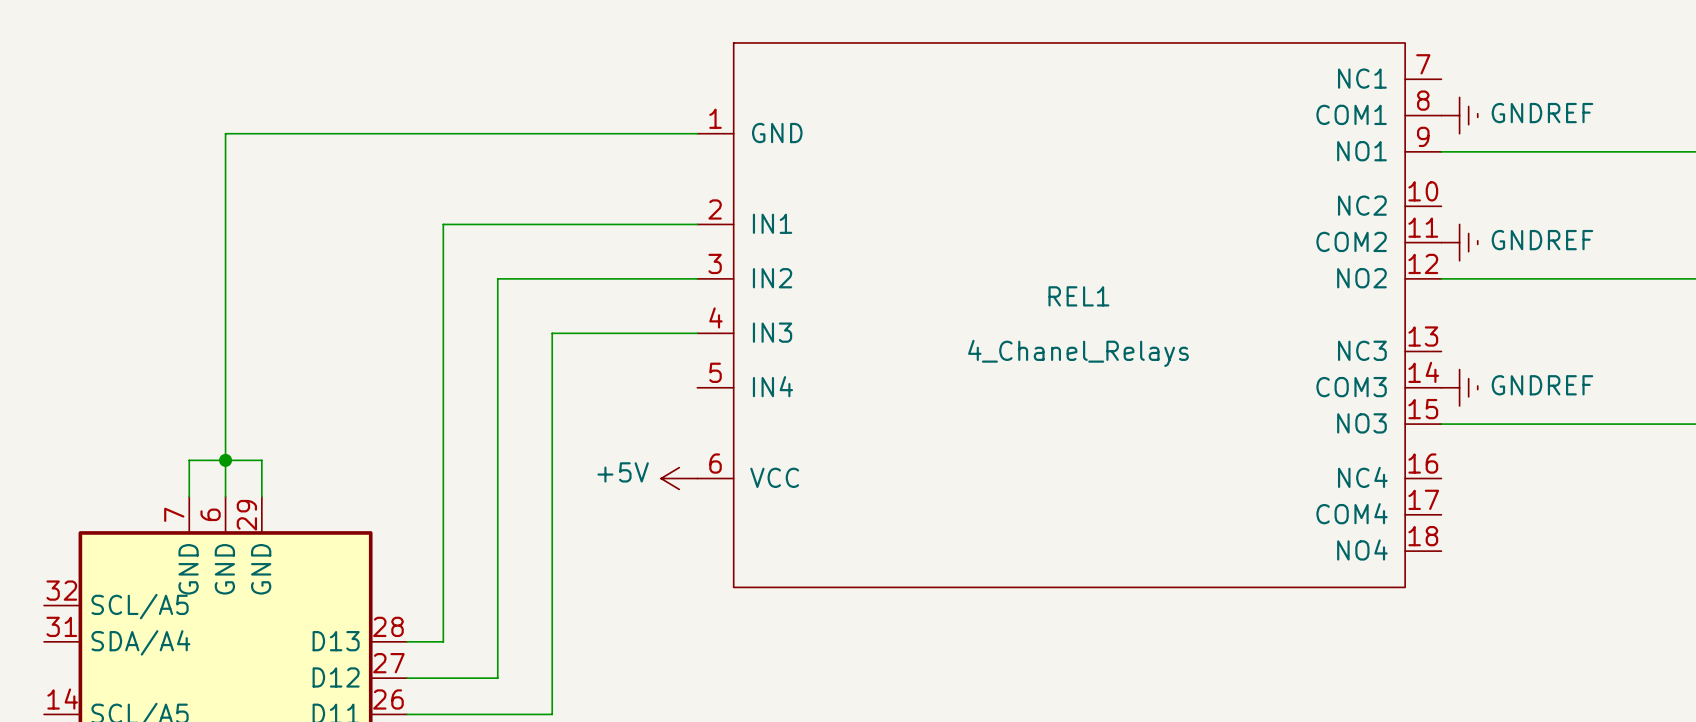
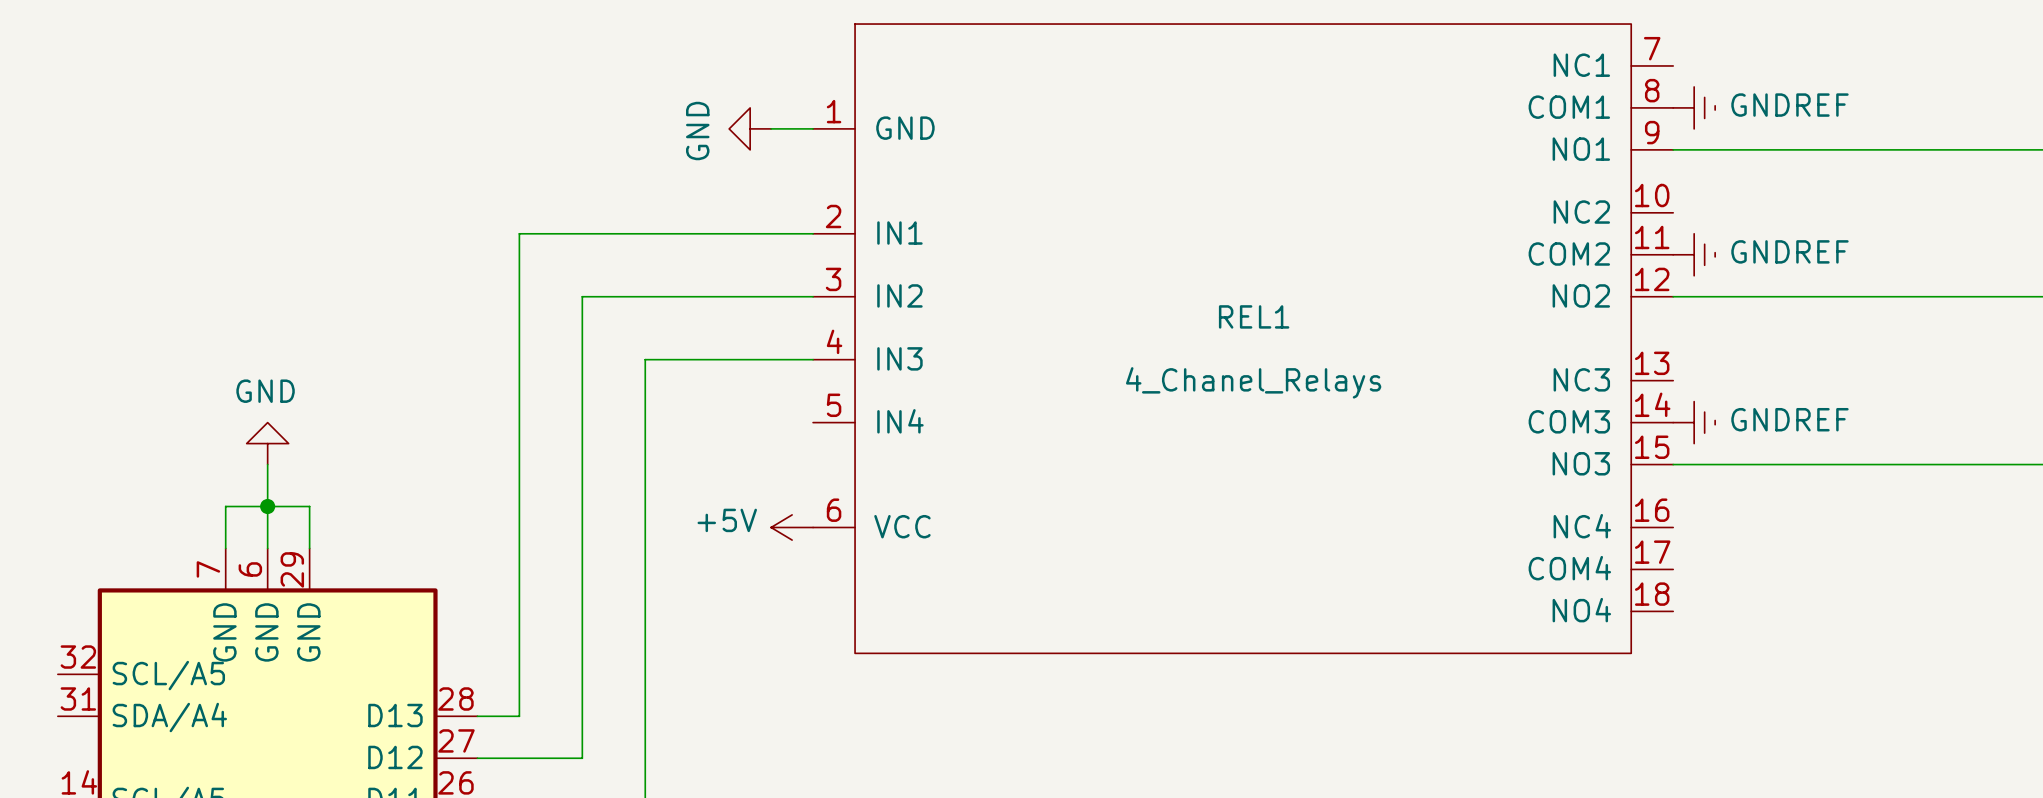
power symbol: none -> GND (750, 128)
wire: (661, 133) (225, 133) (225, 424) -> none
power symbol: none -> GND (267, 443)

